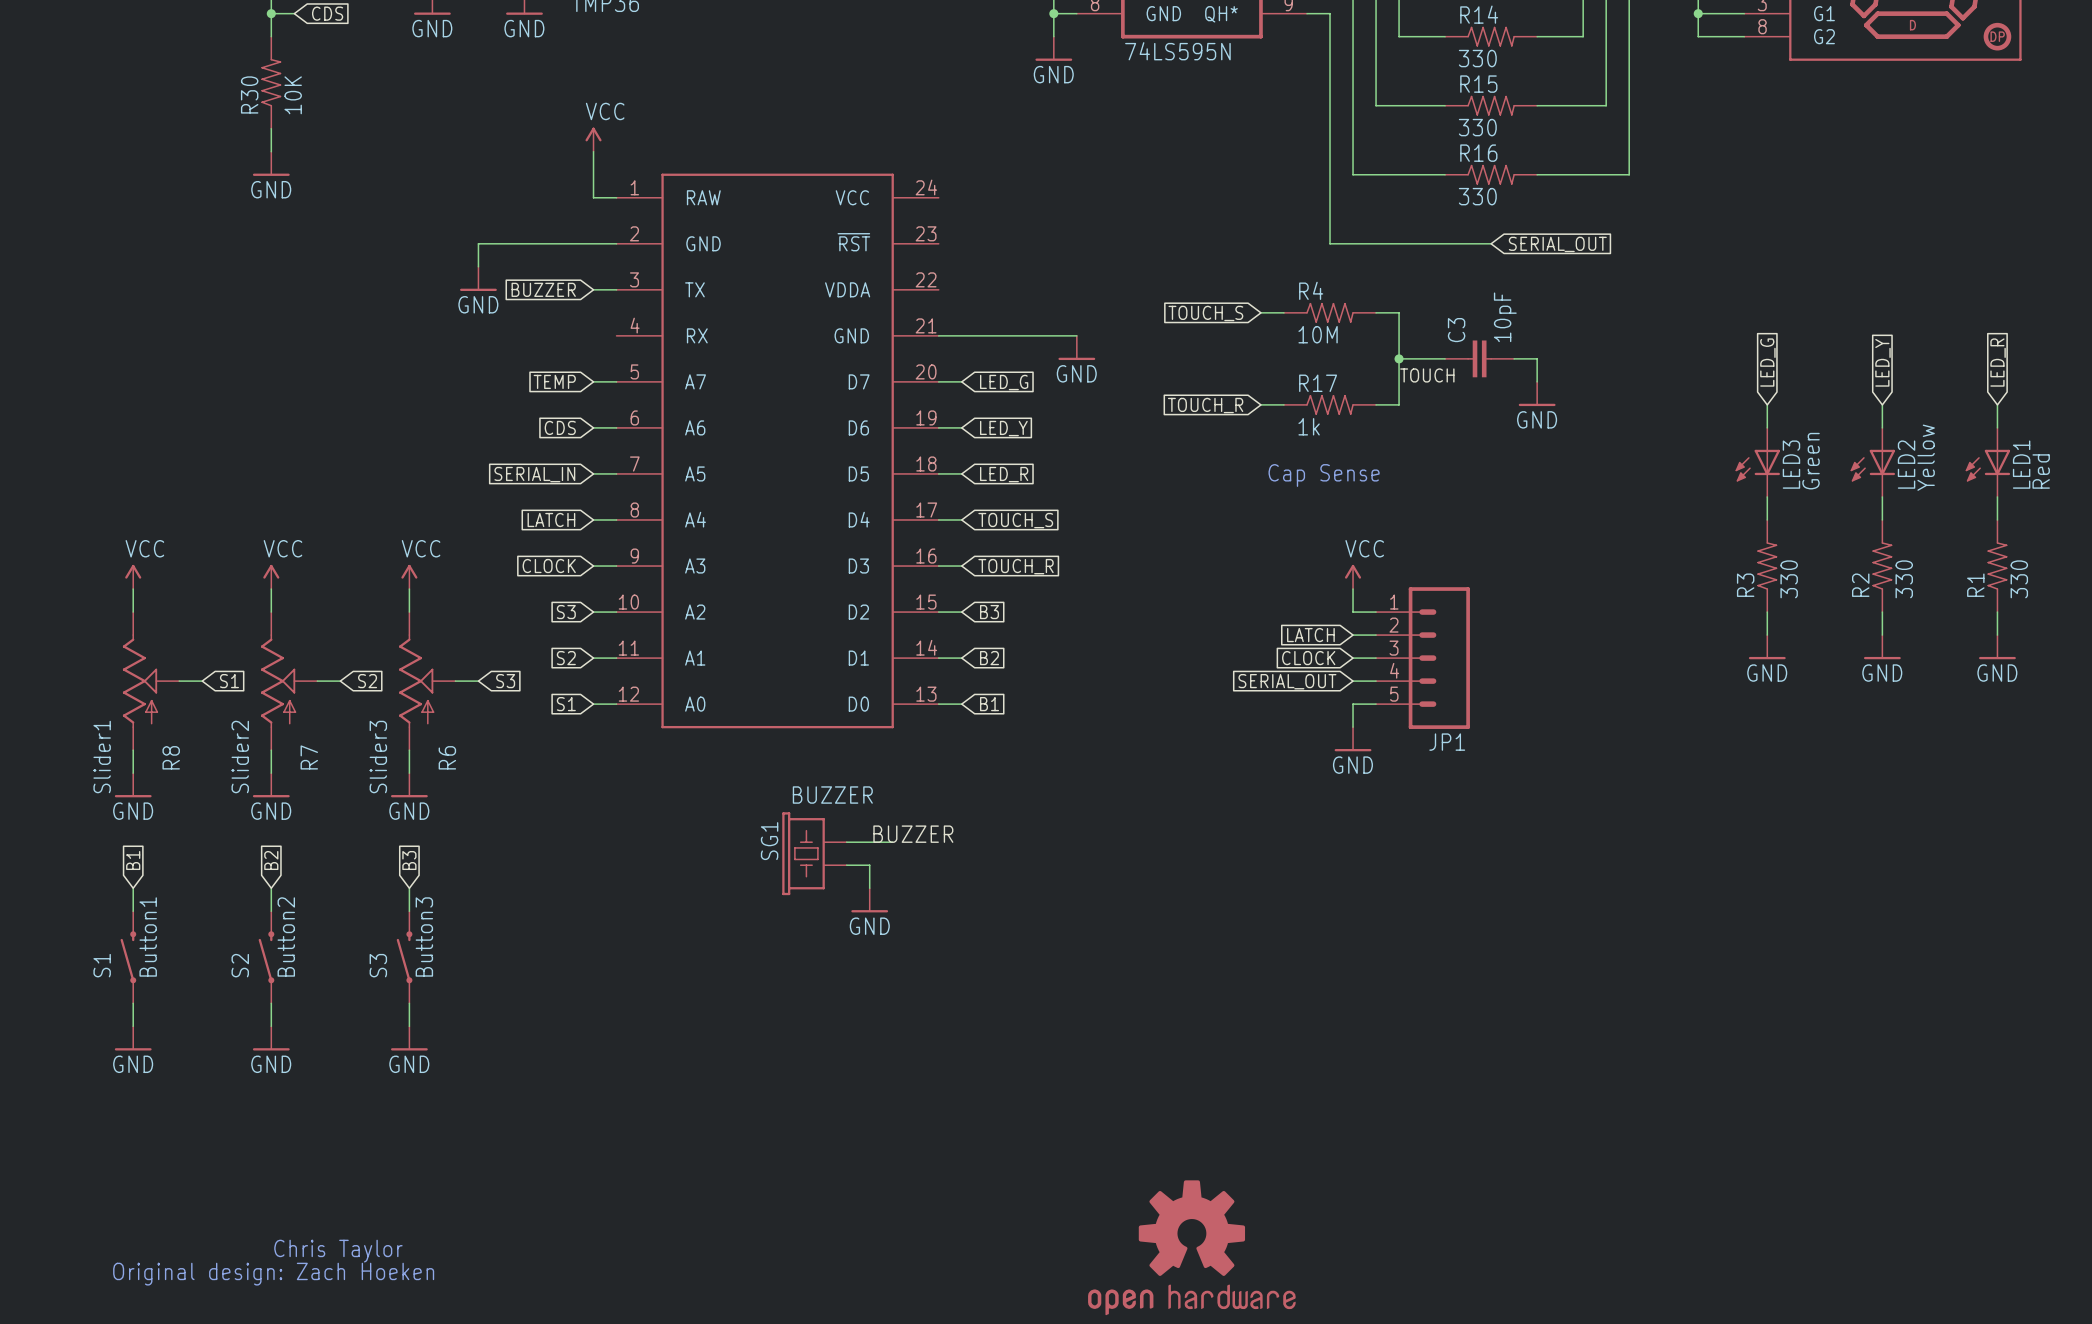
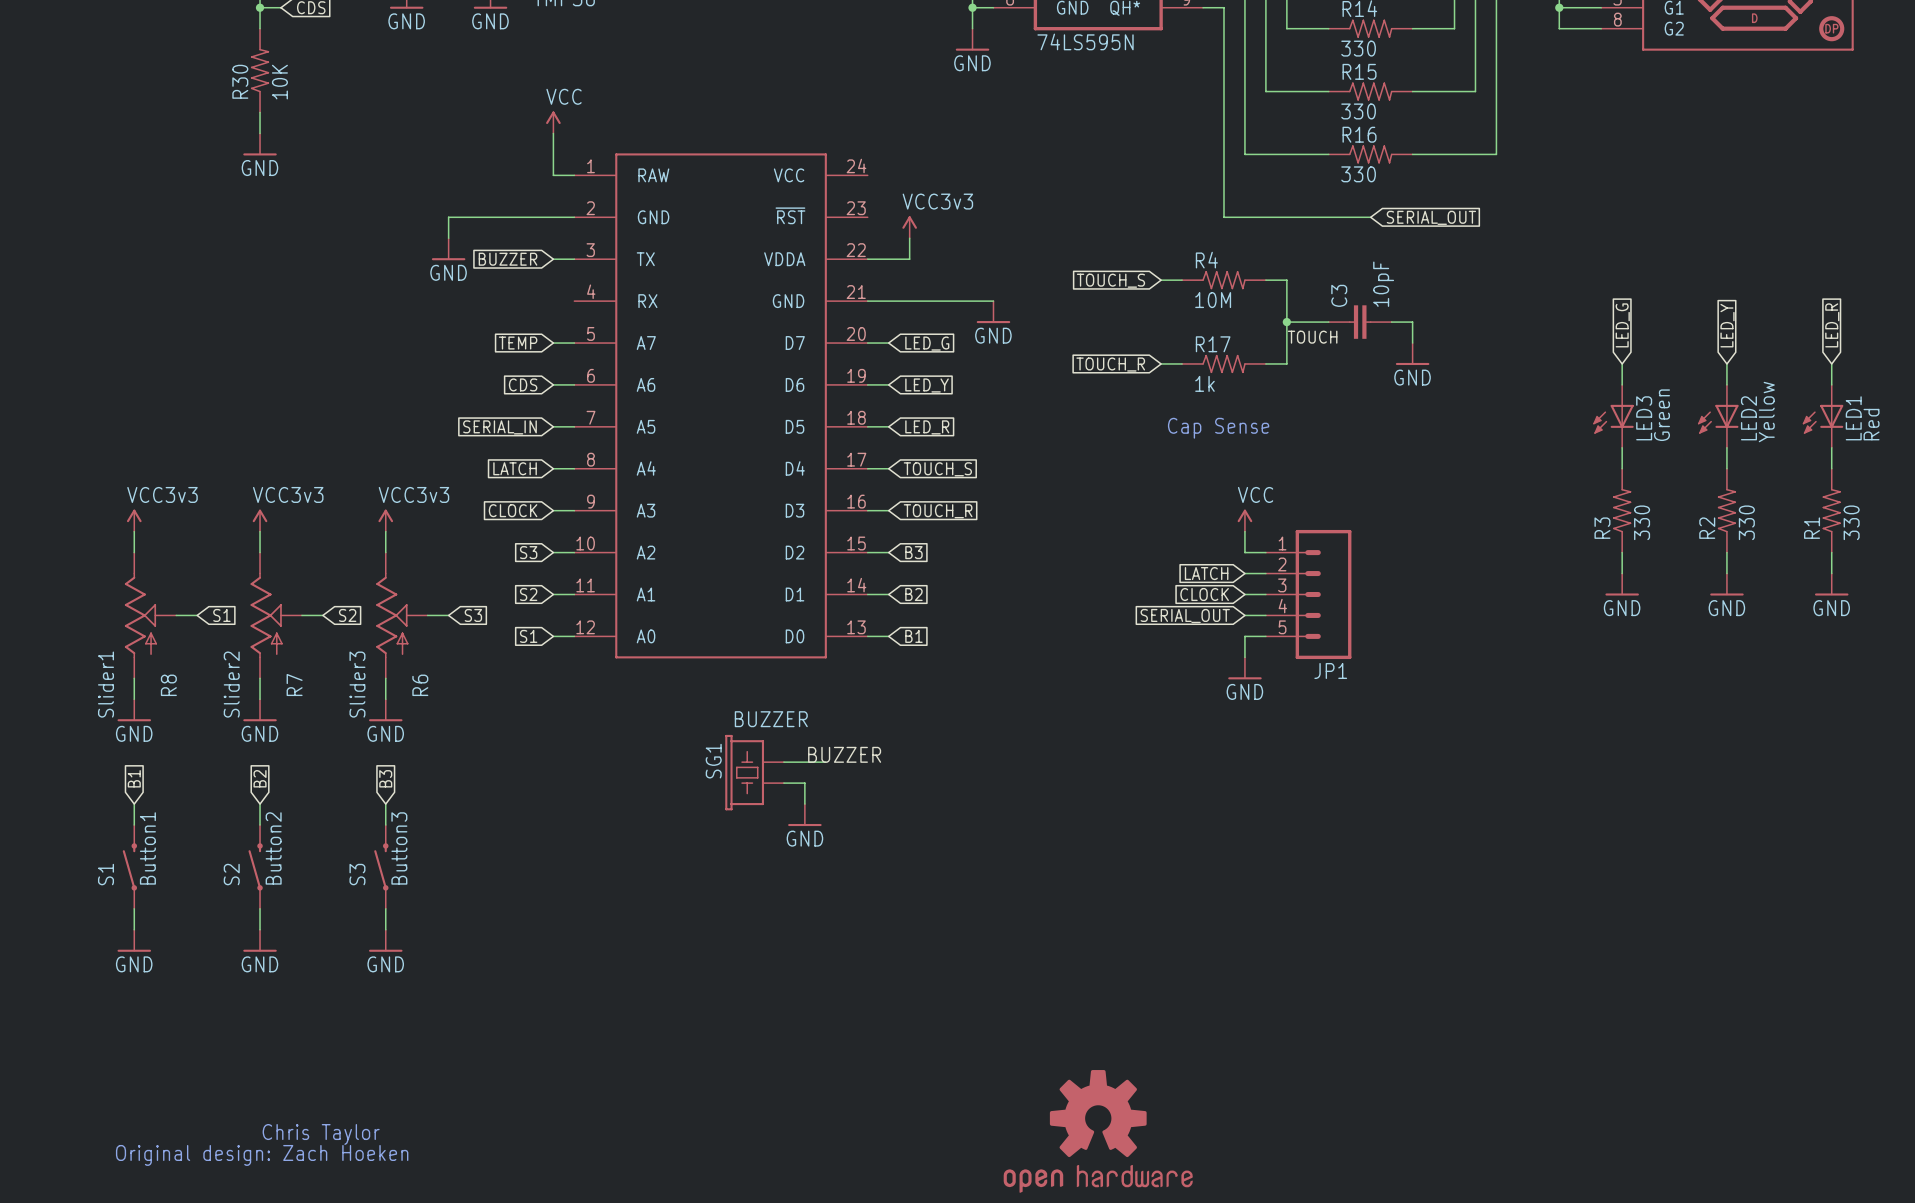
power symbol: none -> VCC3v3 (909, 227)
wire: none -> (909, 238) (909, 259) (867, 259)
power symbol: VCC (133, 576) -> VCC3v3 (134, 520)
power symbol: VCC (271, 576) -> VCC3v3 (260, 520)
power symbol: VCC (409, 576) -> VCC3v3 (385, 520)

